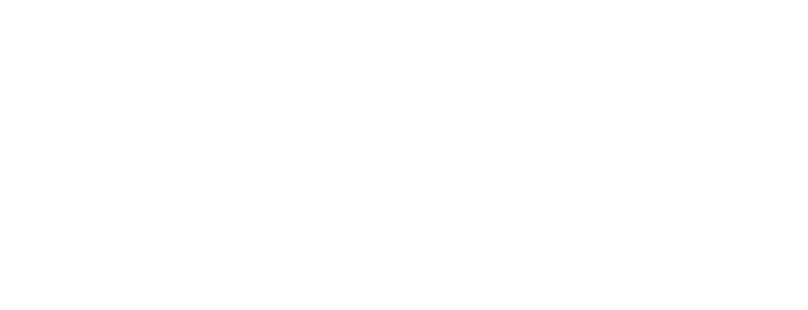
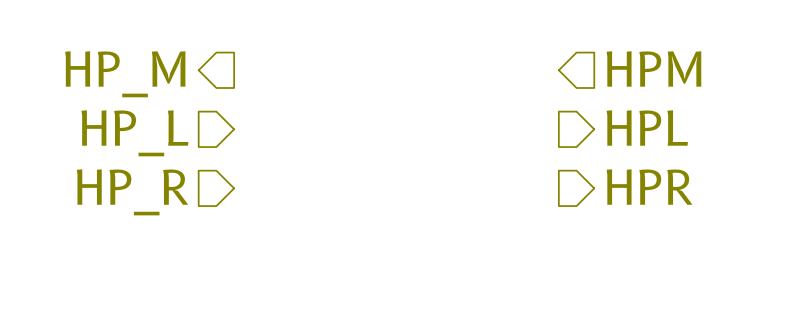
hierarchical label: none -> HPM (653, 68)
hierarchical label: none -> HP_M (125, 74)
hierarchical label: none -> HPL (647, 128)
hierarchical label: none -> HP_L (134, 133)
hierarchical label: none -> HPR (649, 187)
hierarchical label: none -> HP_R (132, 192)

